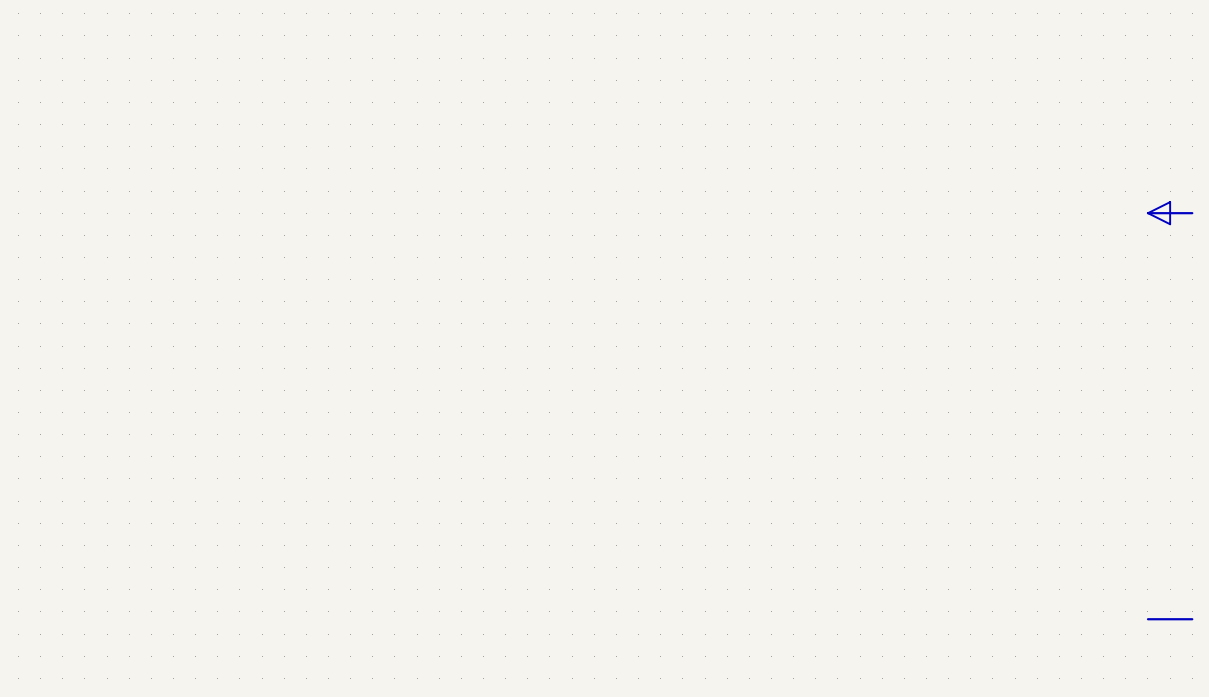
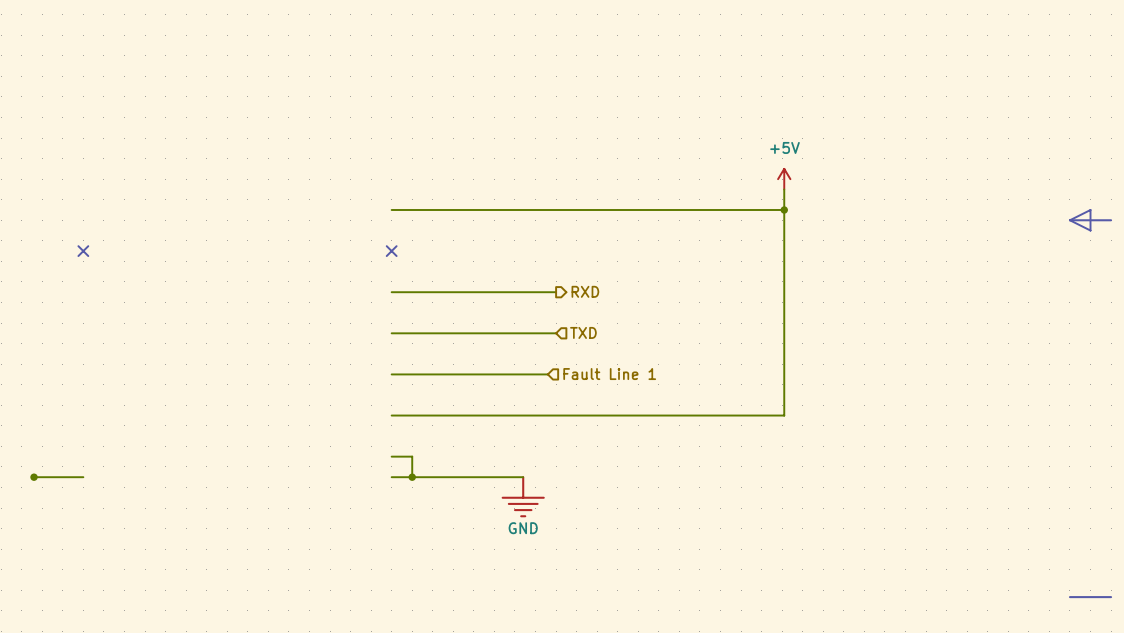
power symbol: none -> +5V (784, 179)
wire: none -> (784, 189) (784, 415) (391, 415)
wire: none -> (391, 209) (784, 209)
junction: none -> (784, 209)
no-connect mark: none -> (83, 251)
no-connect mark: none -> (391, 251)
wire: none -> (391, 292) (556, 292)
hierarchical label: none -> RXD (585, 291)
wire: none -> (391, 333) (556, 333)
hierarchical label: none -> TXD (583, 332)
hierarchical label: none -> Fault Line 1 (609, 374)
wire: none -> (391, 374) (547, 374)
wire: none -> (391, 456) (412, 456) (412, 477)
wire: none -> (34, 477) (83, 477)
junction: none -> (34, 477)
wire: none -> (391, 477) (523, 477)
junction: none -> (412, 477)
power symbol: none -> GND (523, 496)

